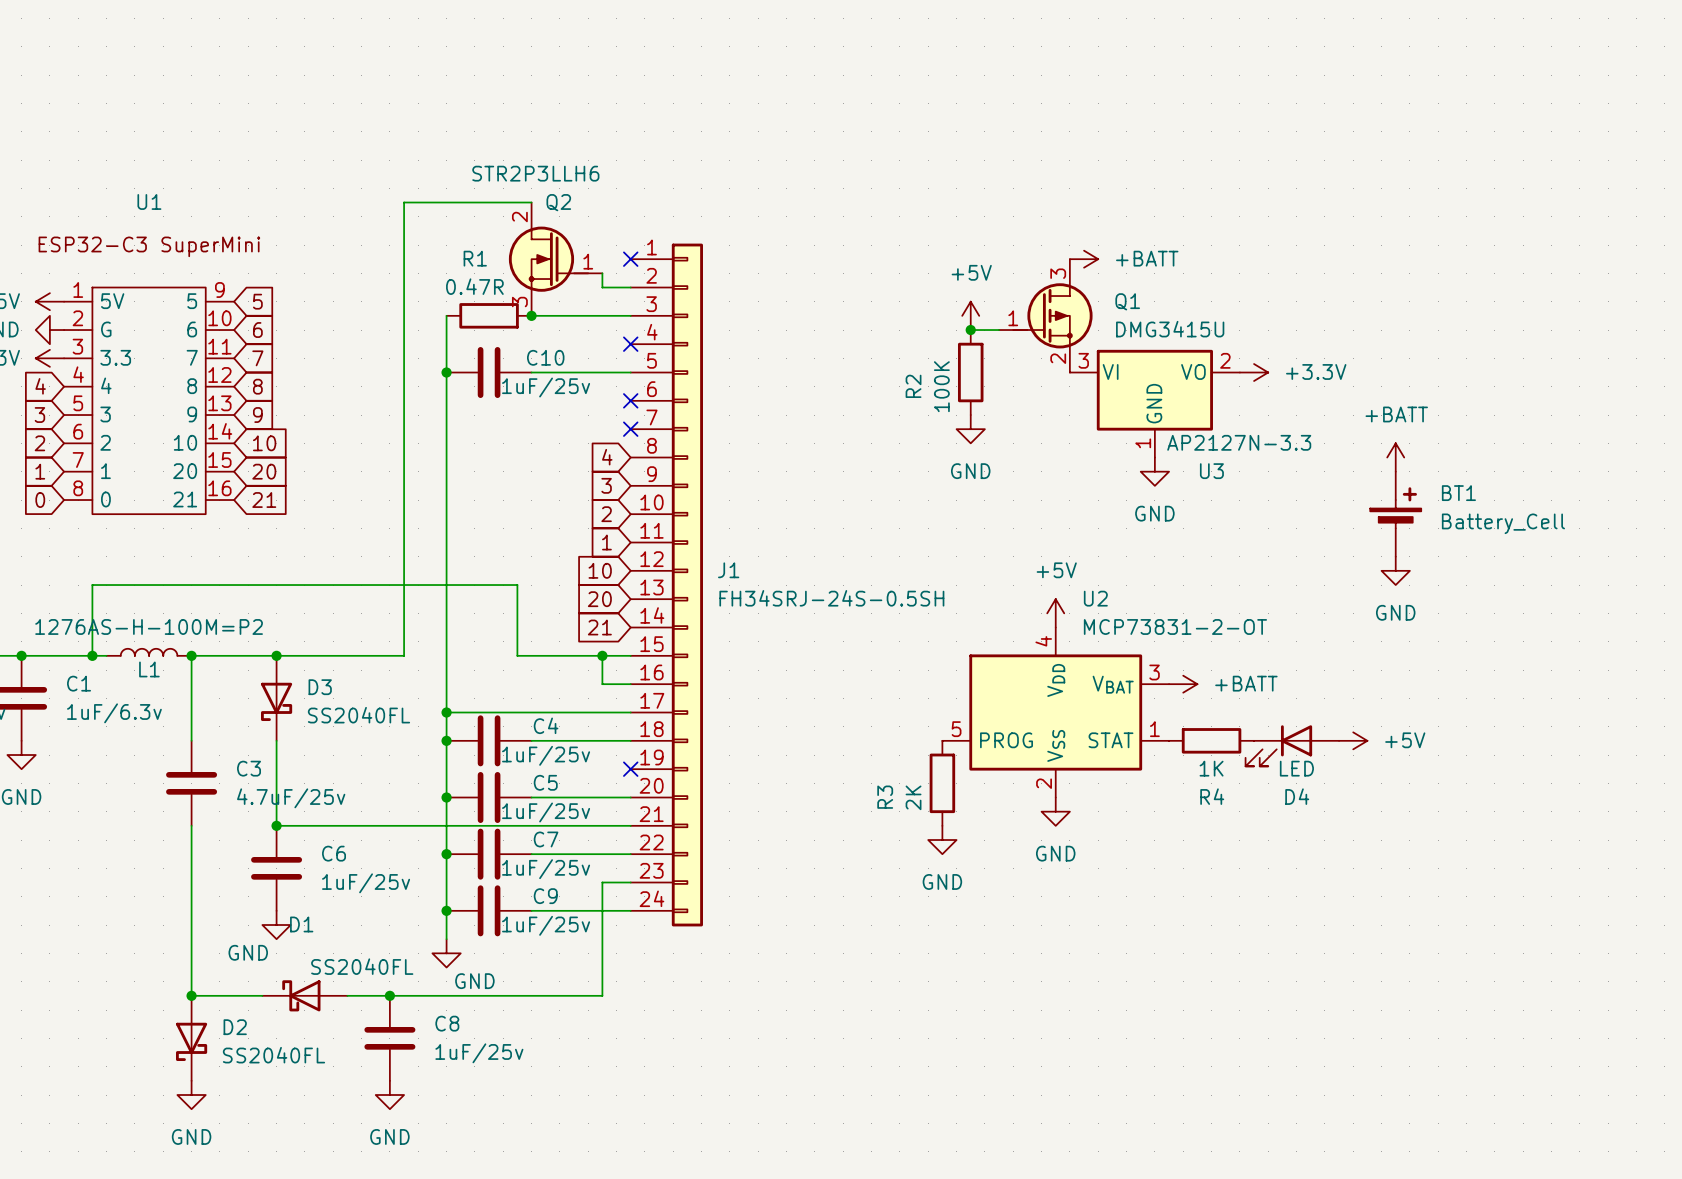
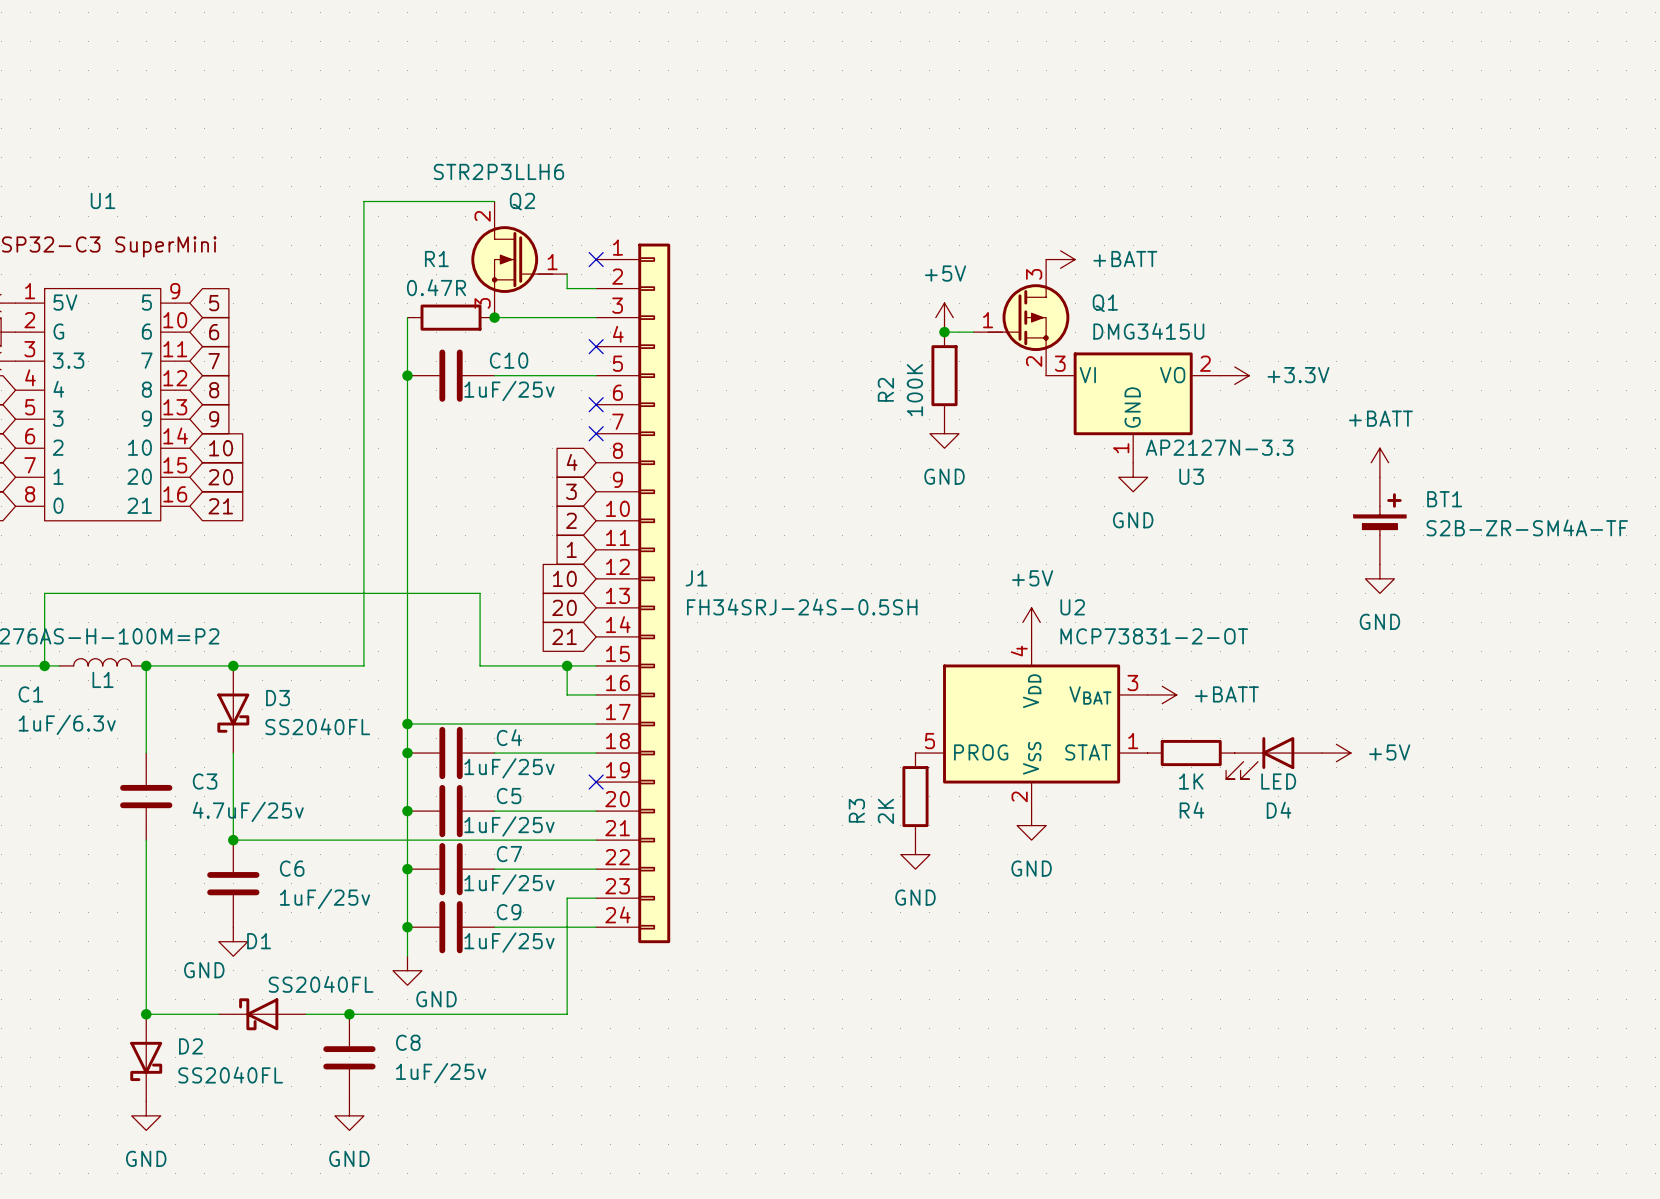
BT1 value: Battery_Cell (1503, 523) -> S2B-ZR-SM4A-TF (1527, 527)

